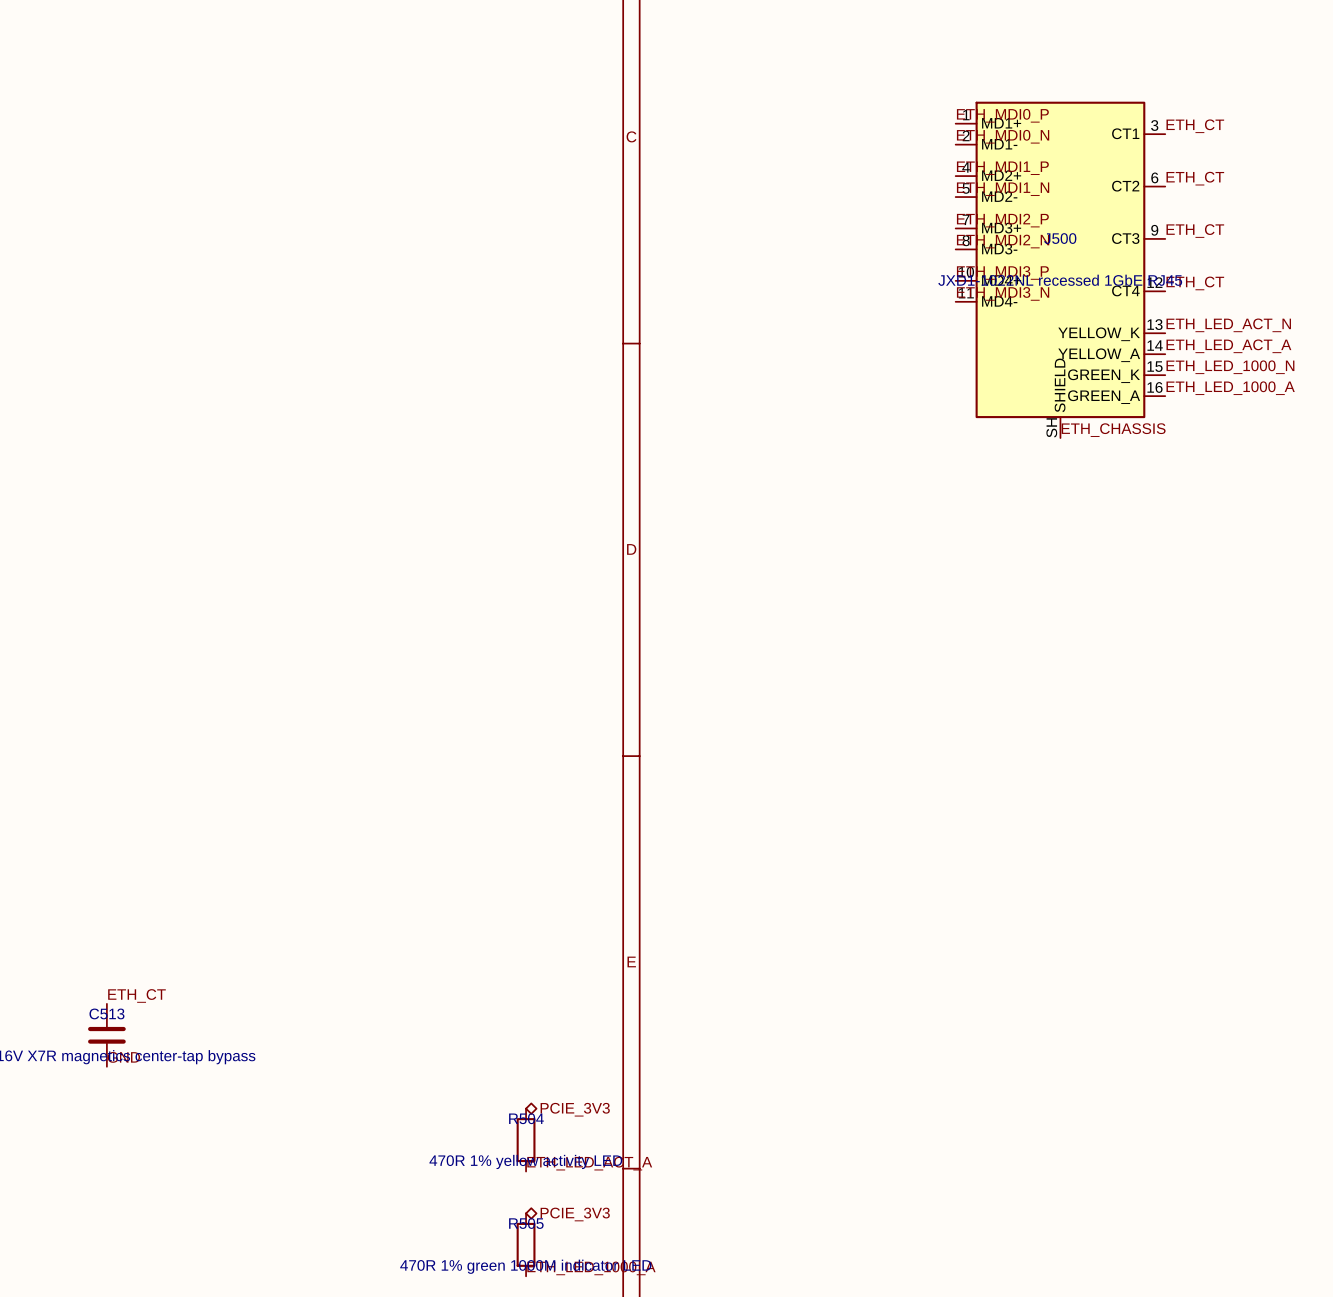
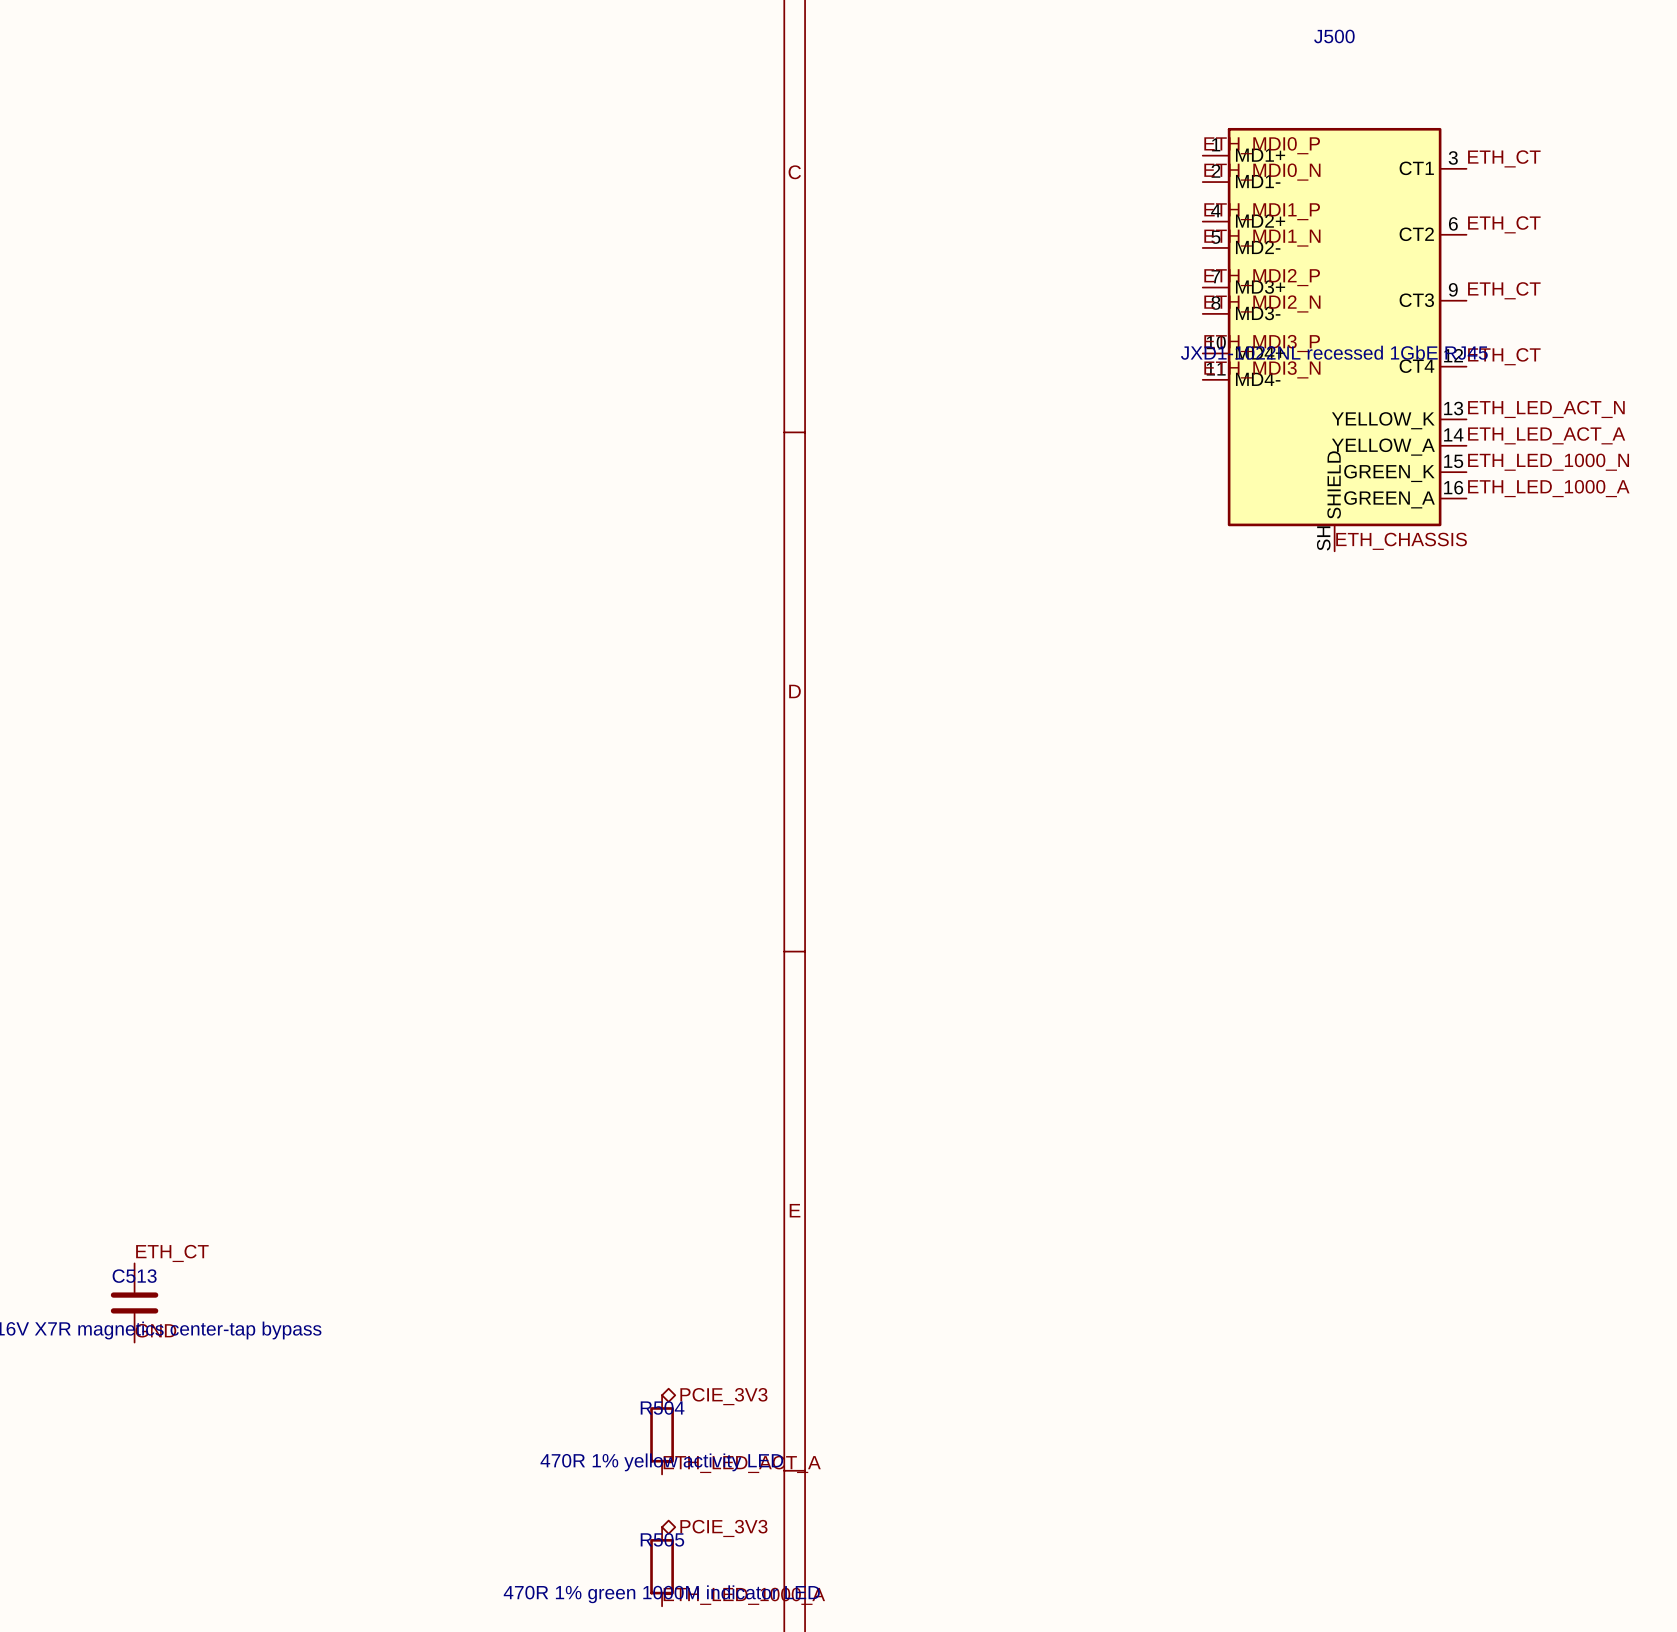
J500 name position: J500 (1060, 238) -> J500 (1334, 36)

